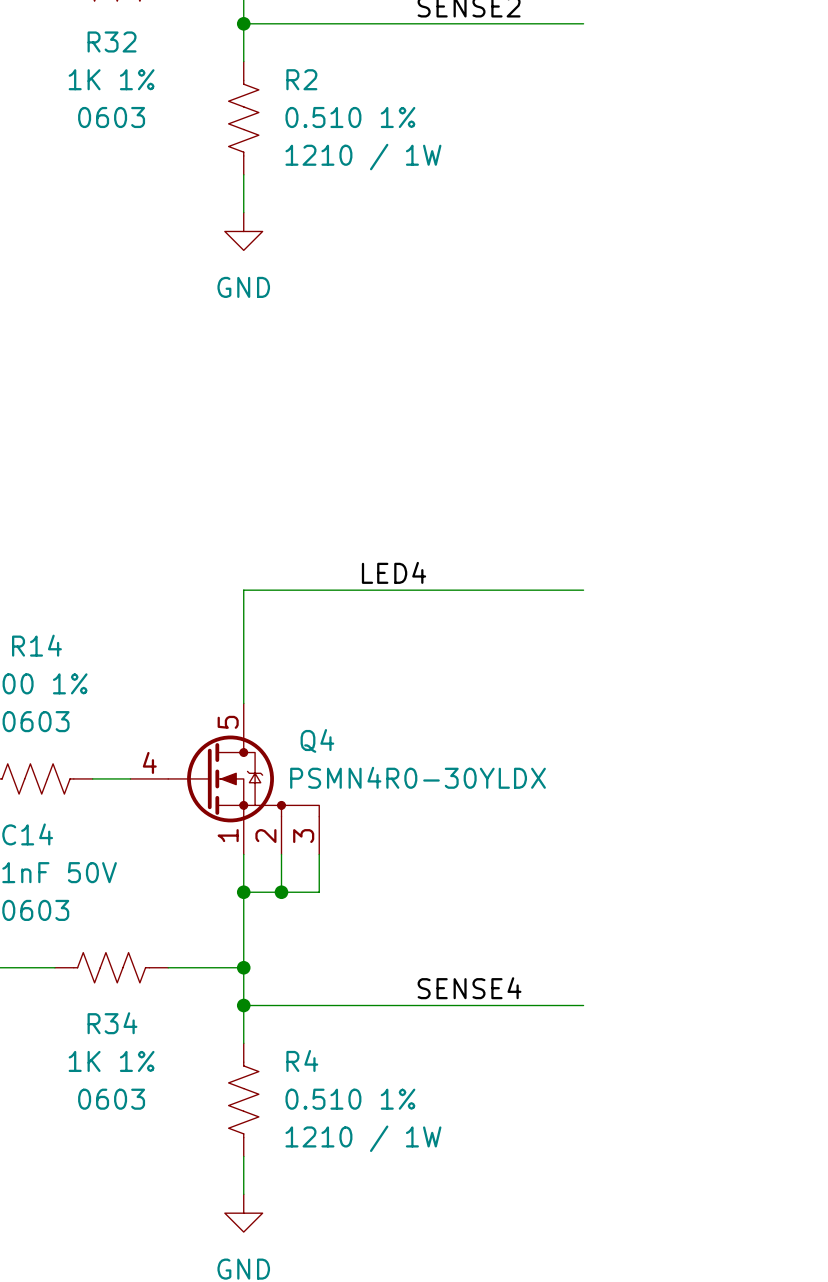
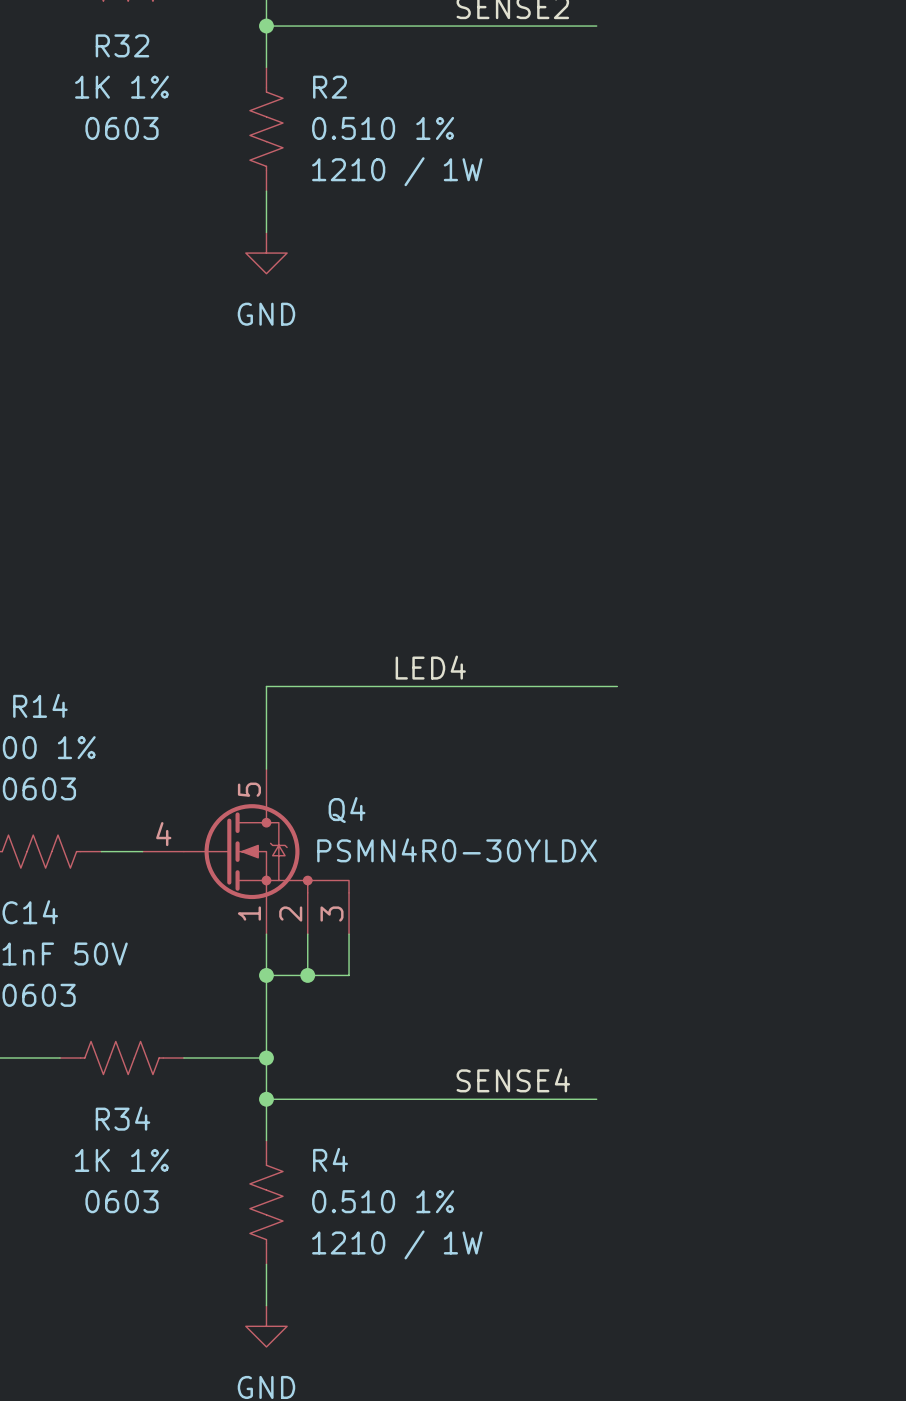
wire: (545, 23) (583, 23) -> none
label position: LED4 (394, 572) -> LED4 (430, 667)
wire: (583, 590) (243, 590) (243, 627) -> (617, 686) (266, 686)
wire: (545, 1005) (583, 1005) -> none

